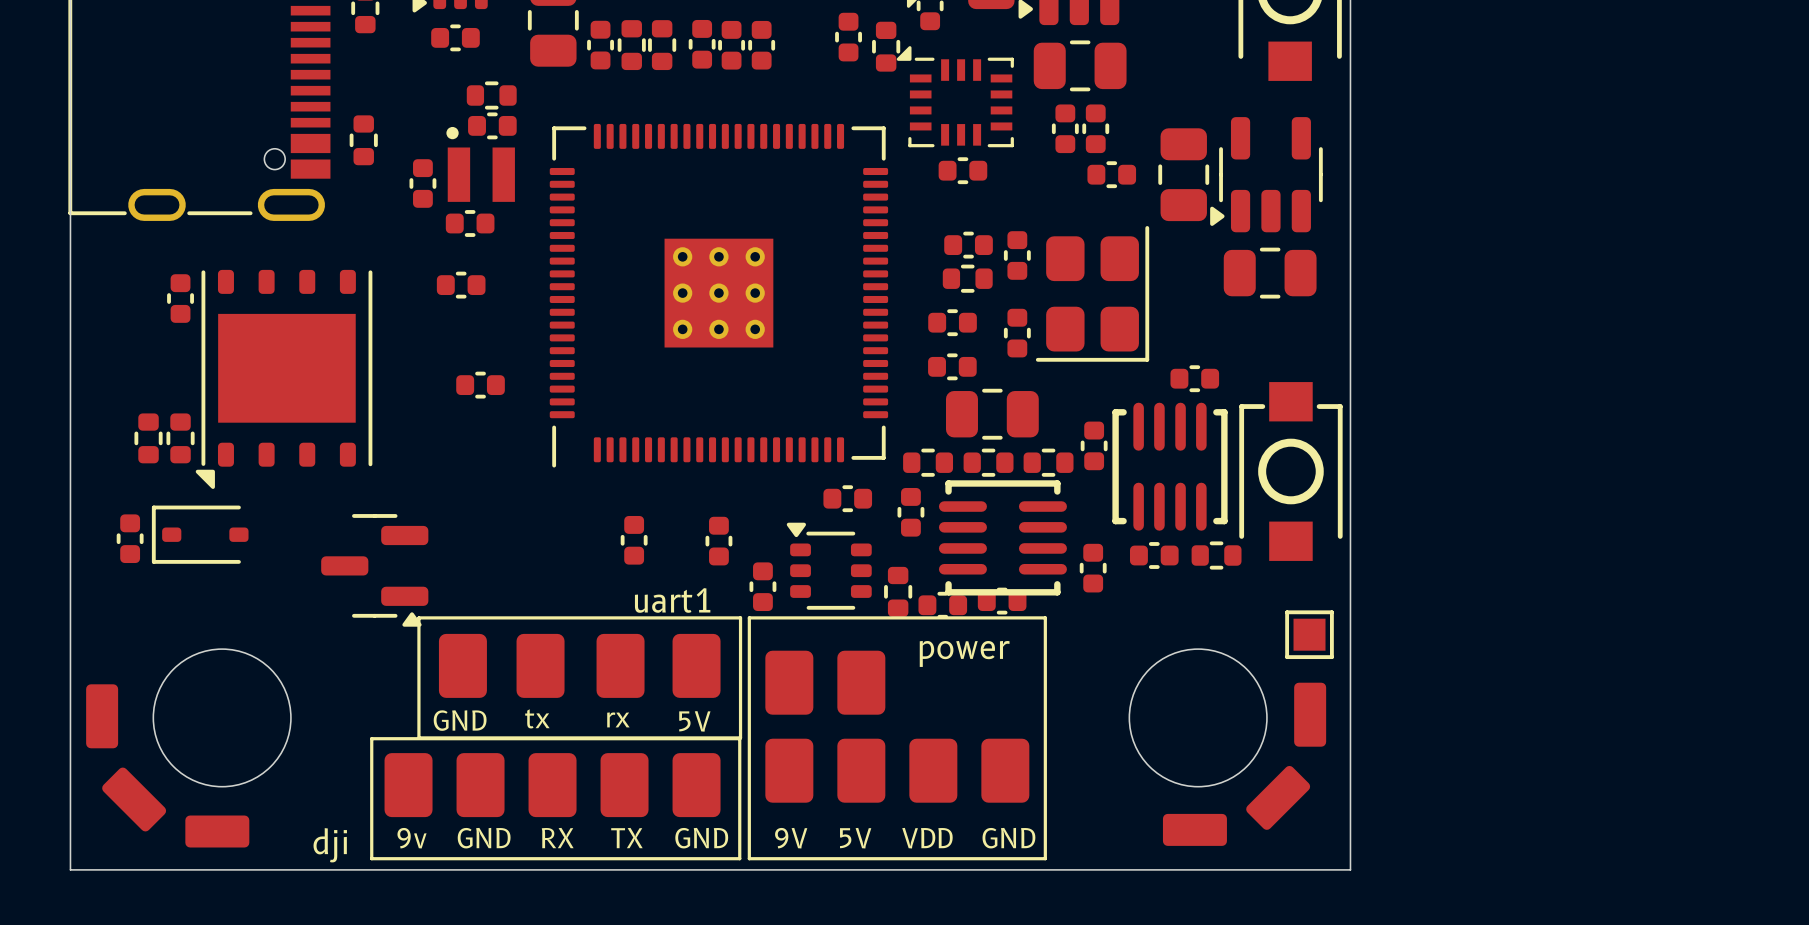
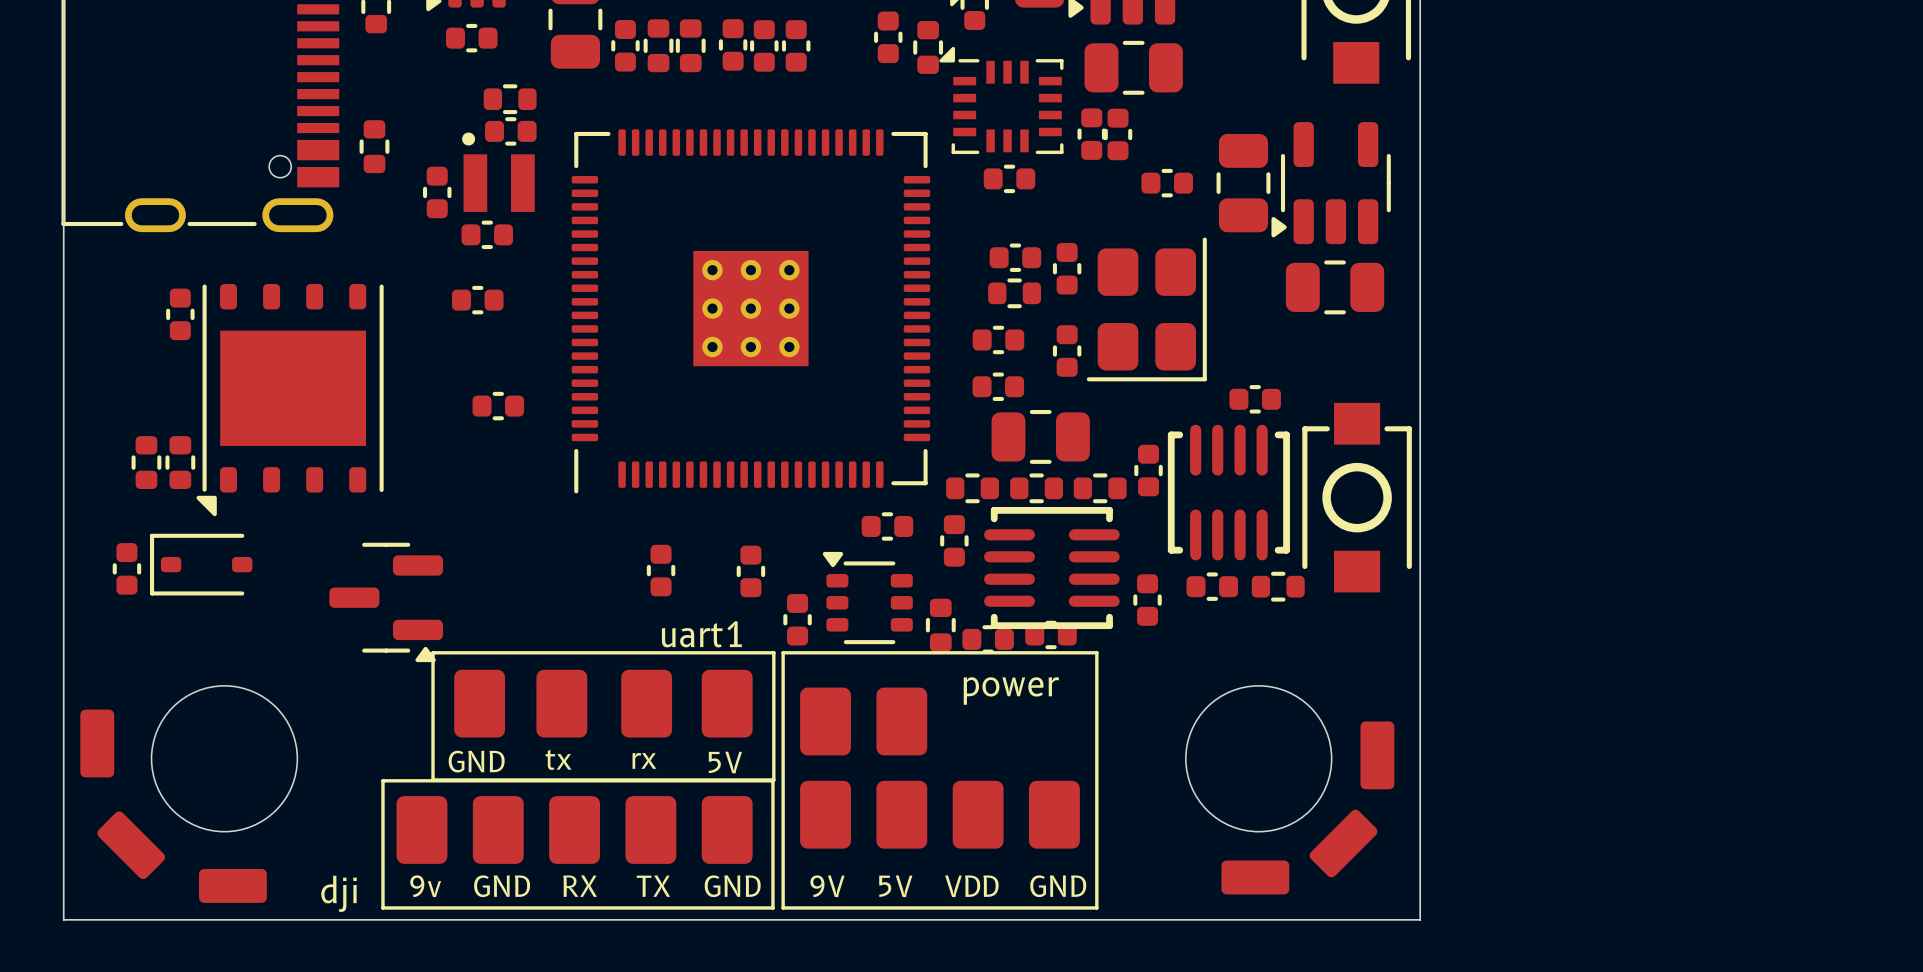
part position: (1095, 128) -> (1091, 134)
part: (1309, 634) -> none
part footprint: [86, 684, 250, 848] -> [80, 709, 267, 903]

